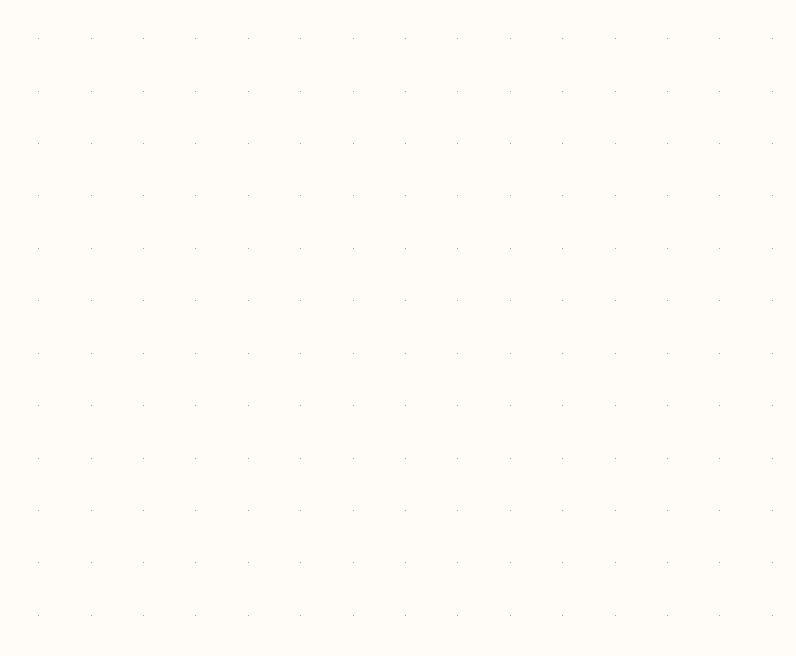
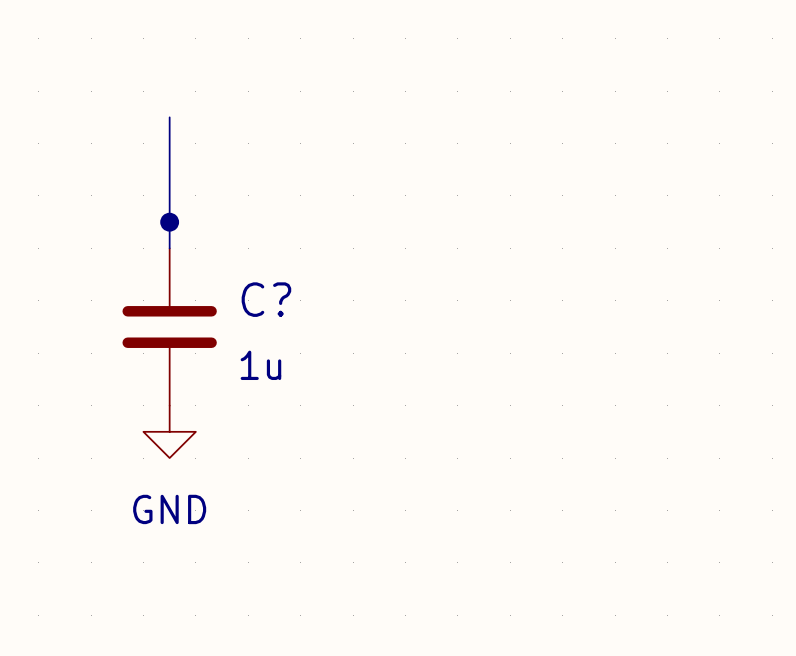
wire: none -> (169, 117) (169, 248)
junction: none -> (169, 222)
C?: none -> (169, 327)
power symbol: none -> GND (169, 431)

